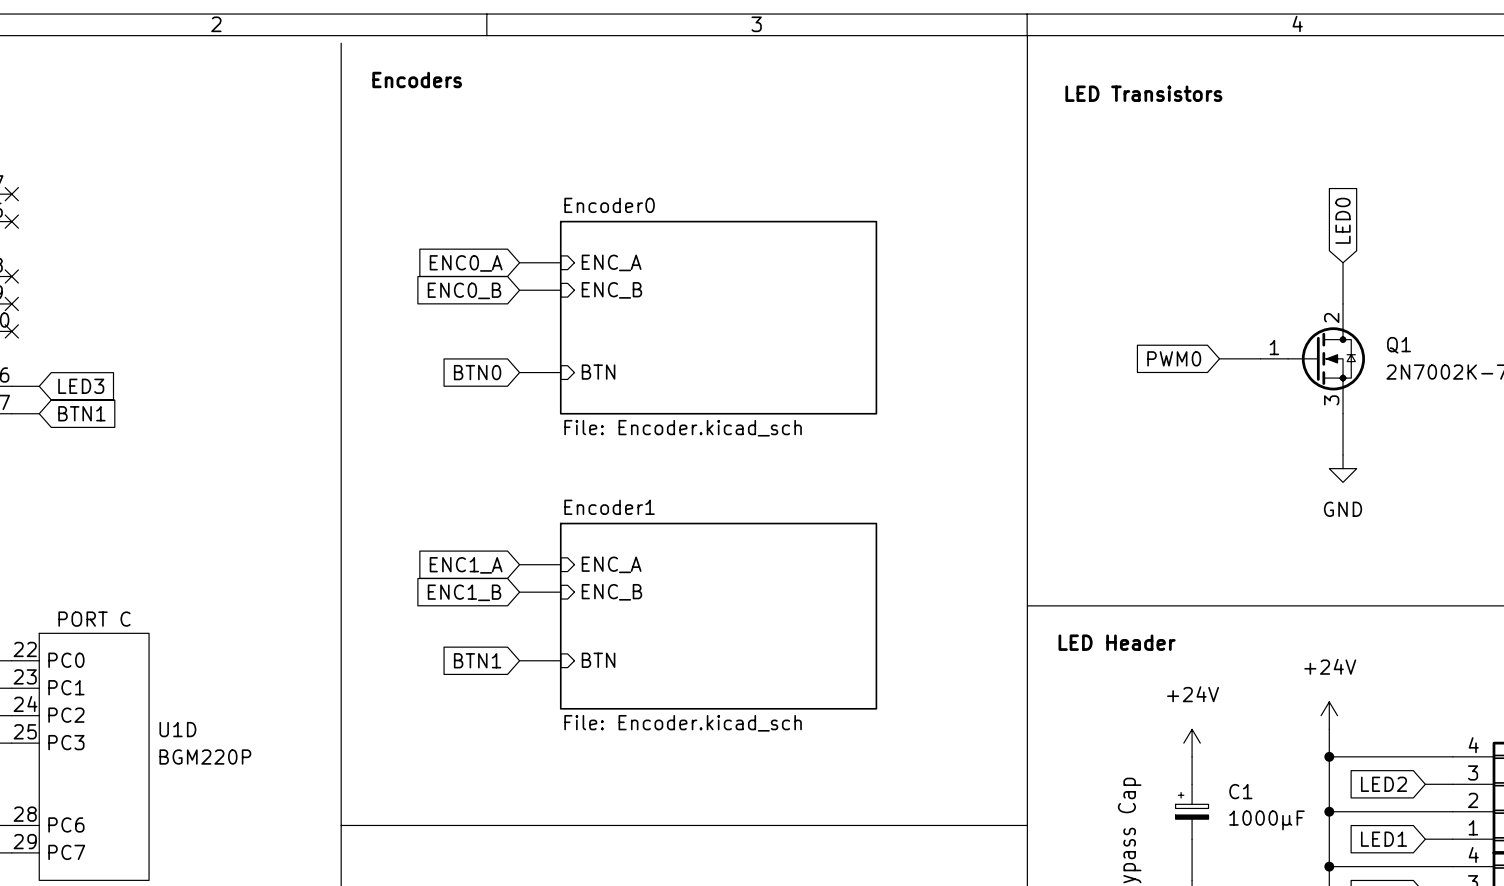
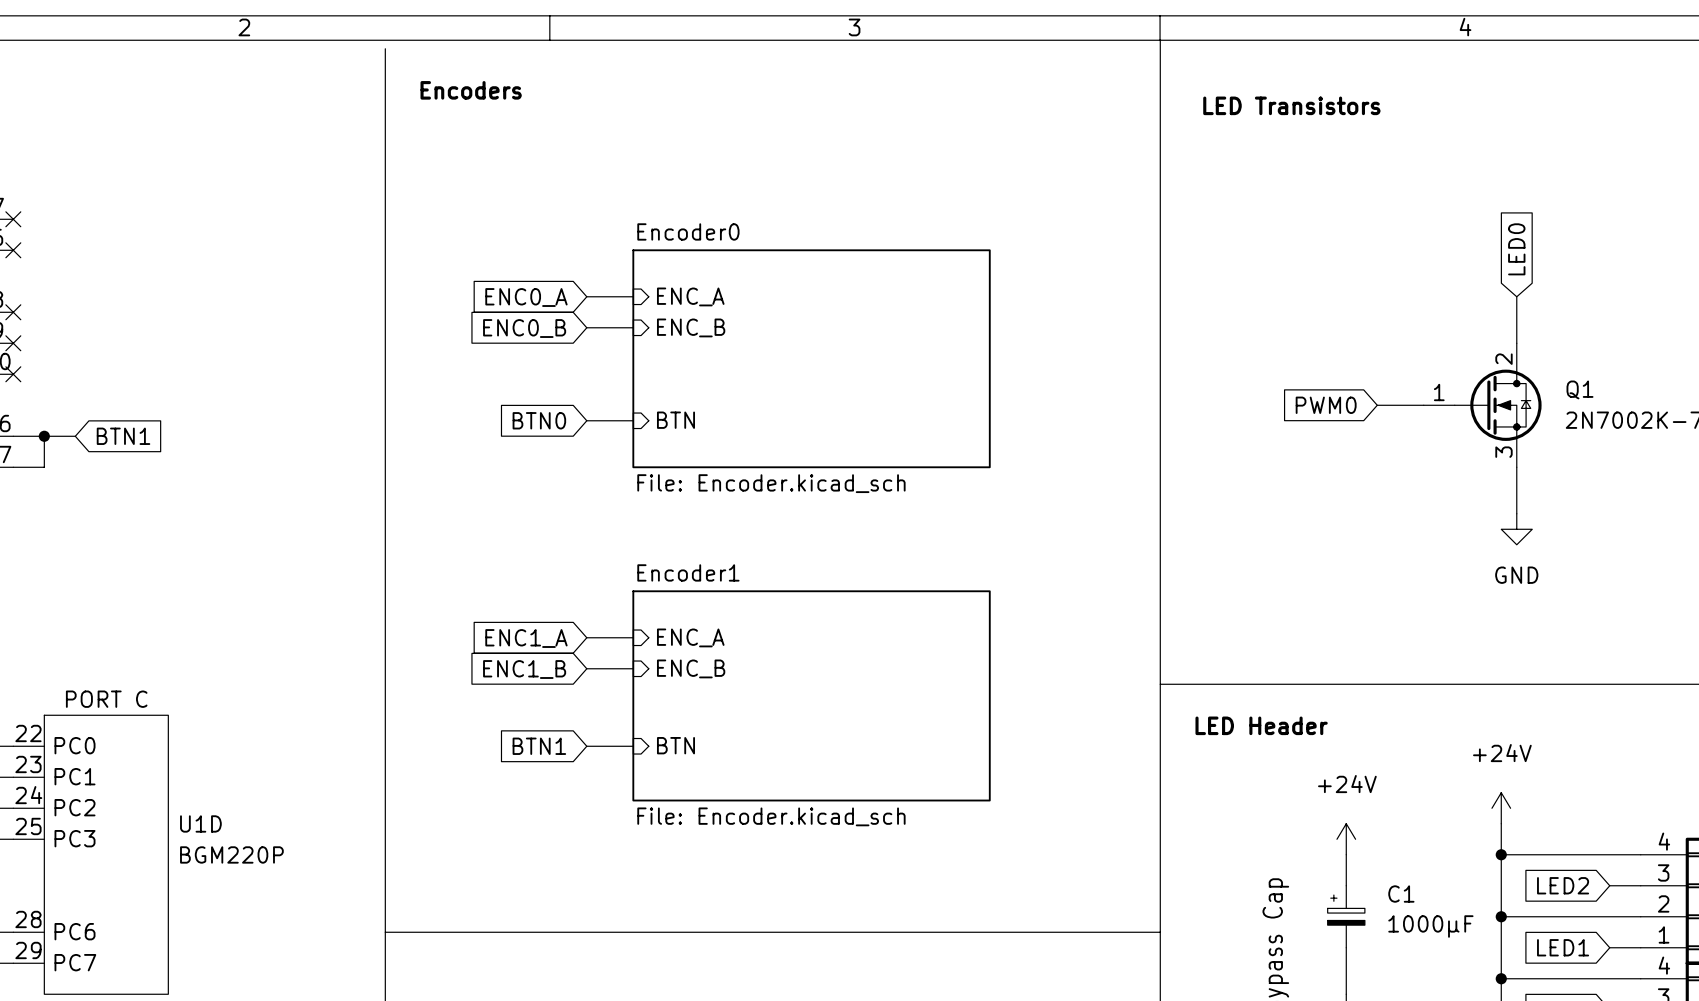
junction: none -> (44, 436)
wire: none -> (75, 436) (44, 436) (44, 467)
global label: LED3 (81, 386) -> none
global label position: BTN1 (81, 413) -> BTN1 (123, 436)

